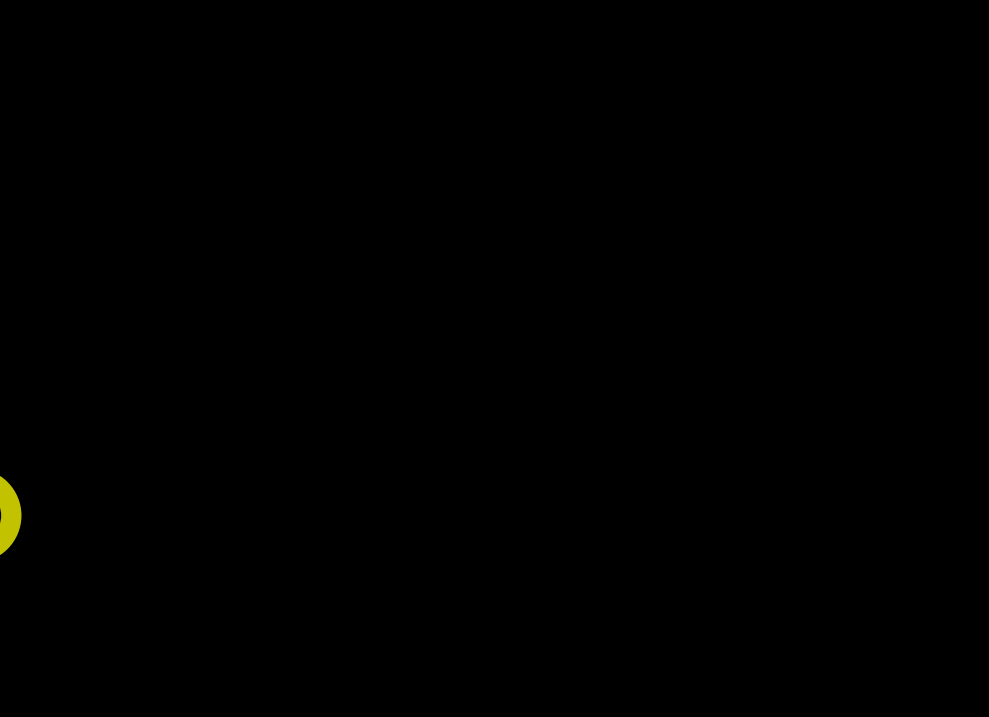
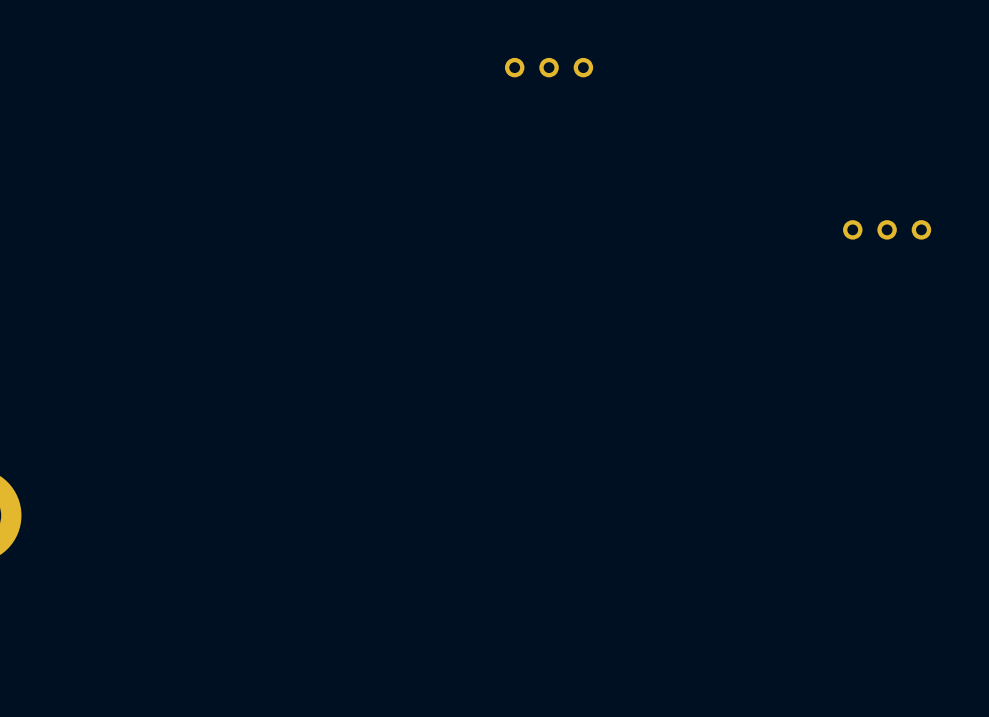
part: none -> (549, 67)
part: none -> (887, 229)

